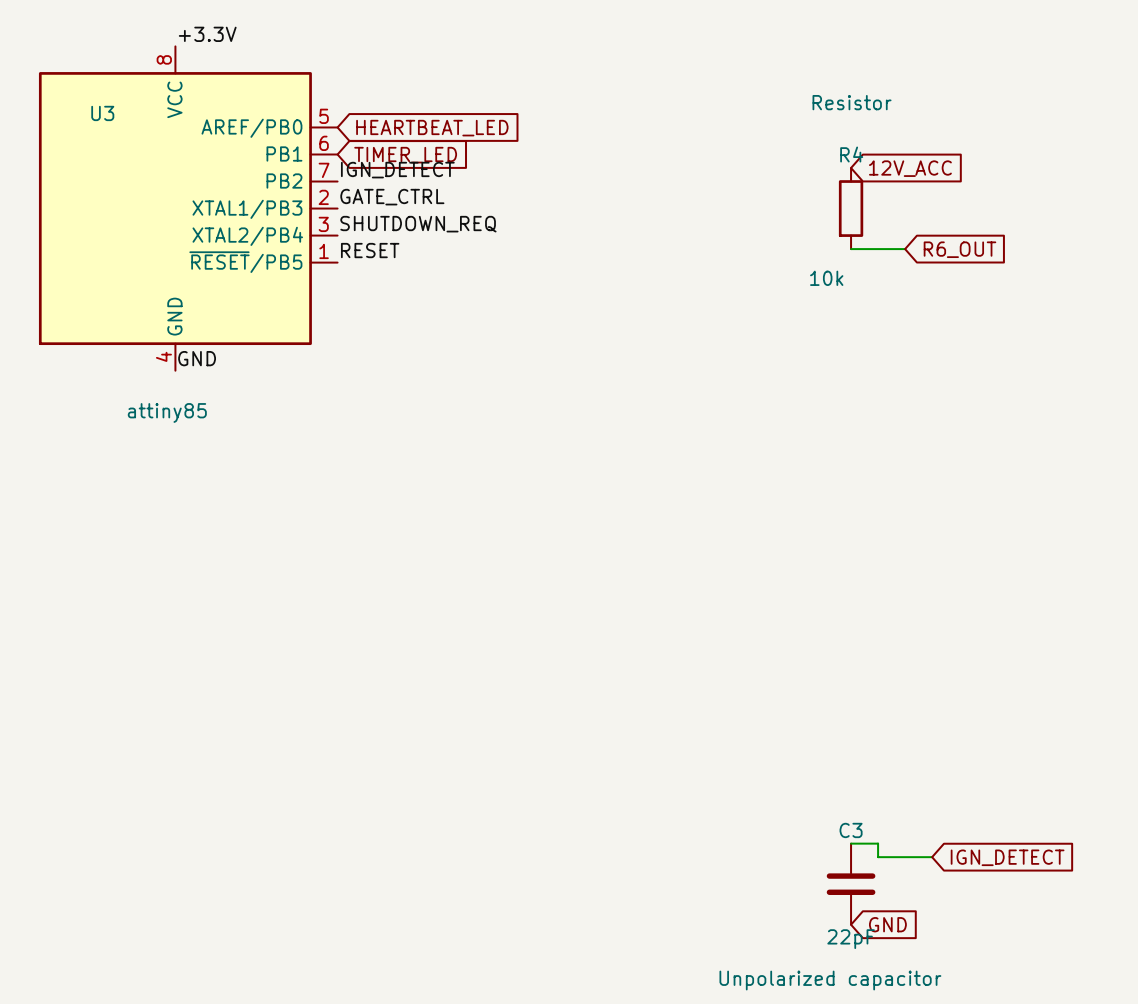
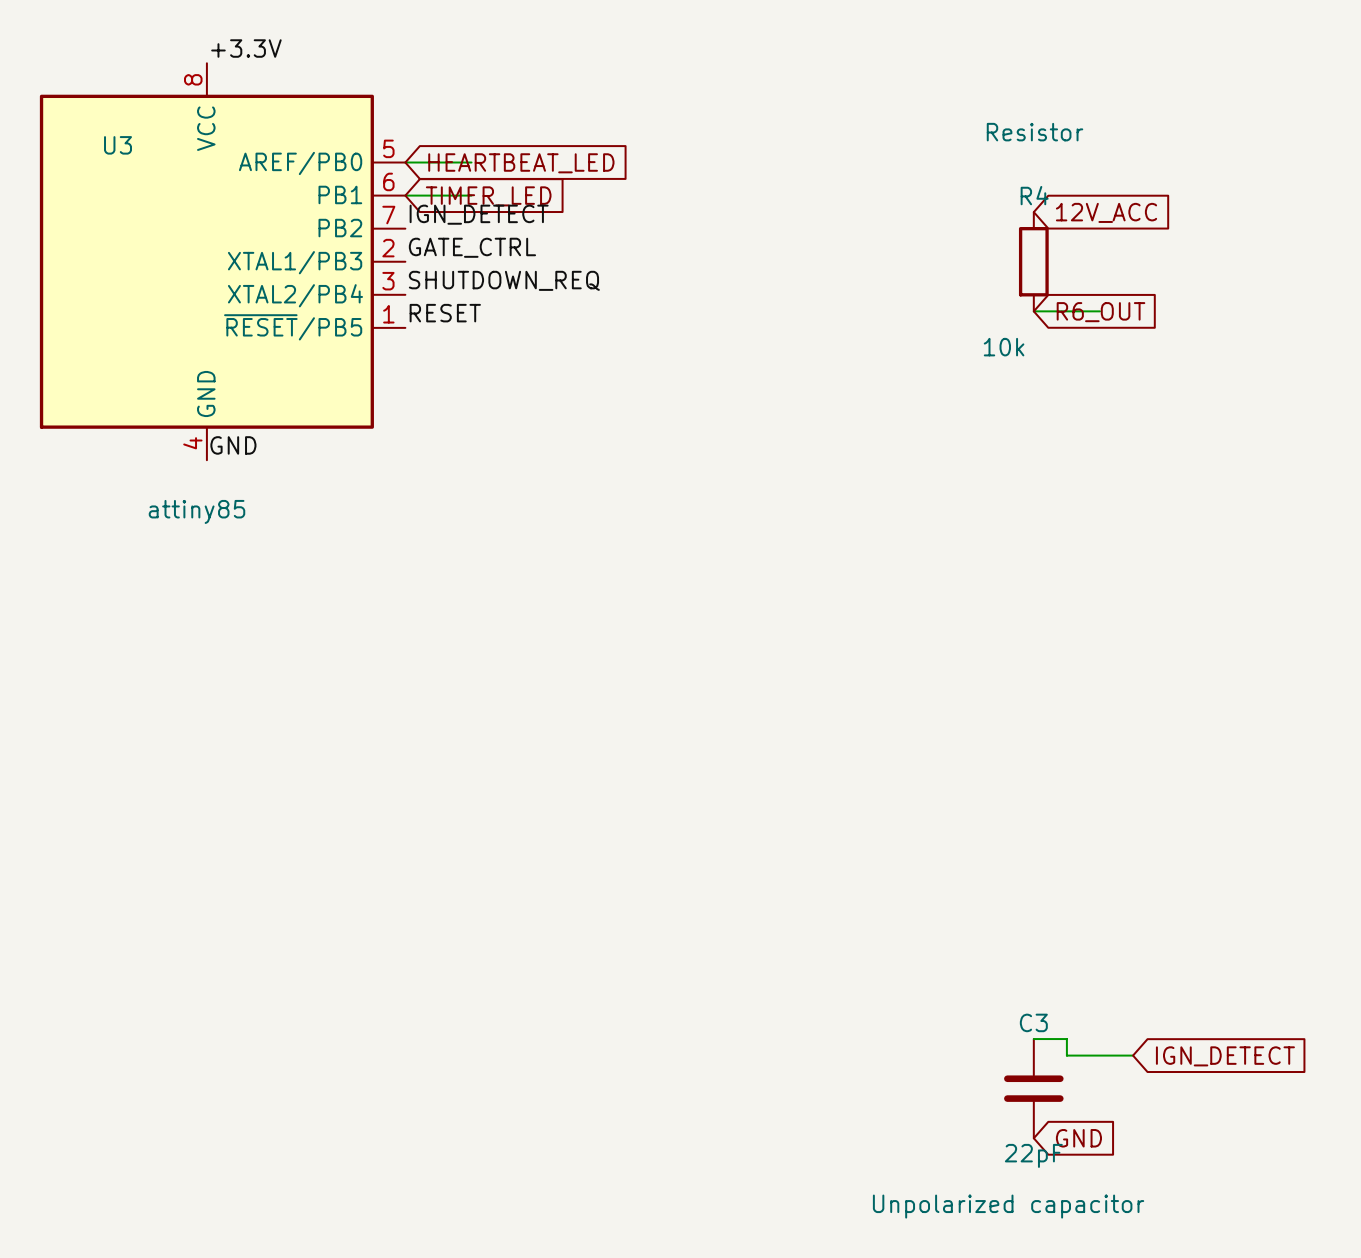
wire: none -> (405, 162) (471, 162)
wire: none -> (405, 195) (471, 195)
global label position: R6_OUT (959, 249) -> R6_OUT (1100, 312)

